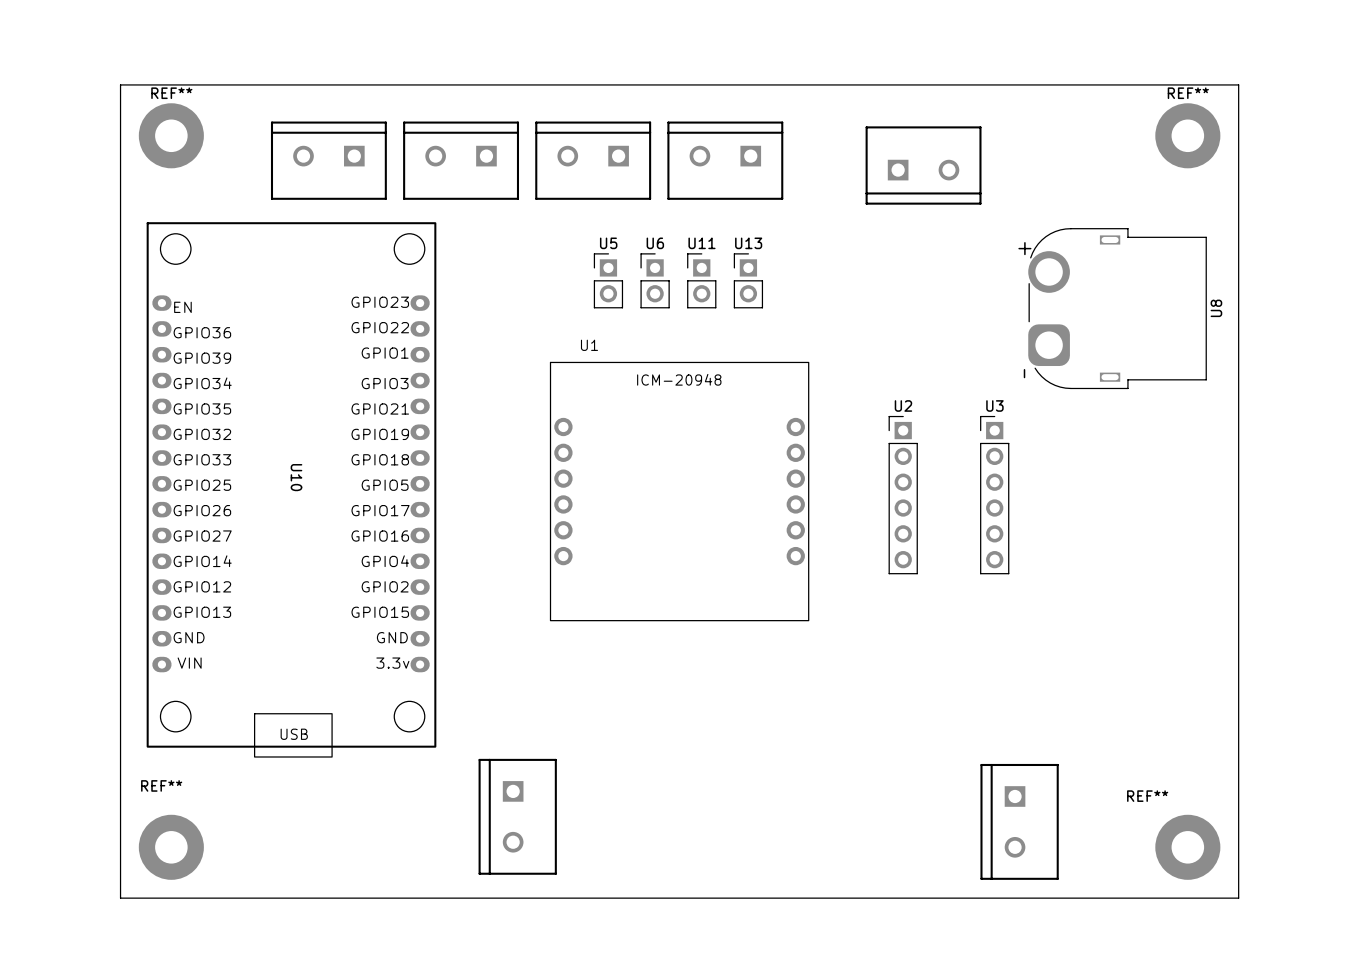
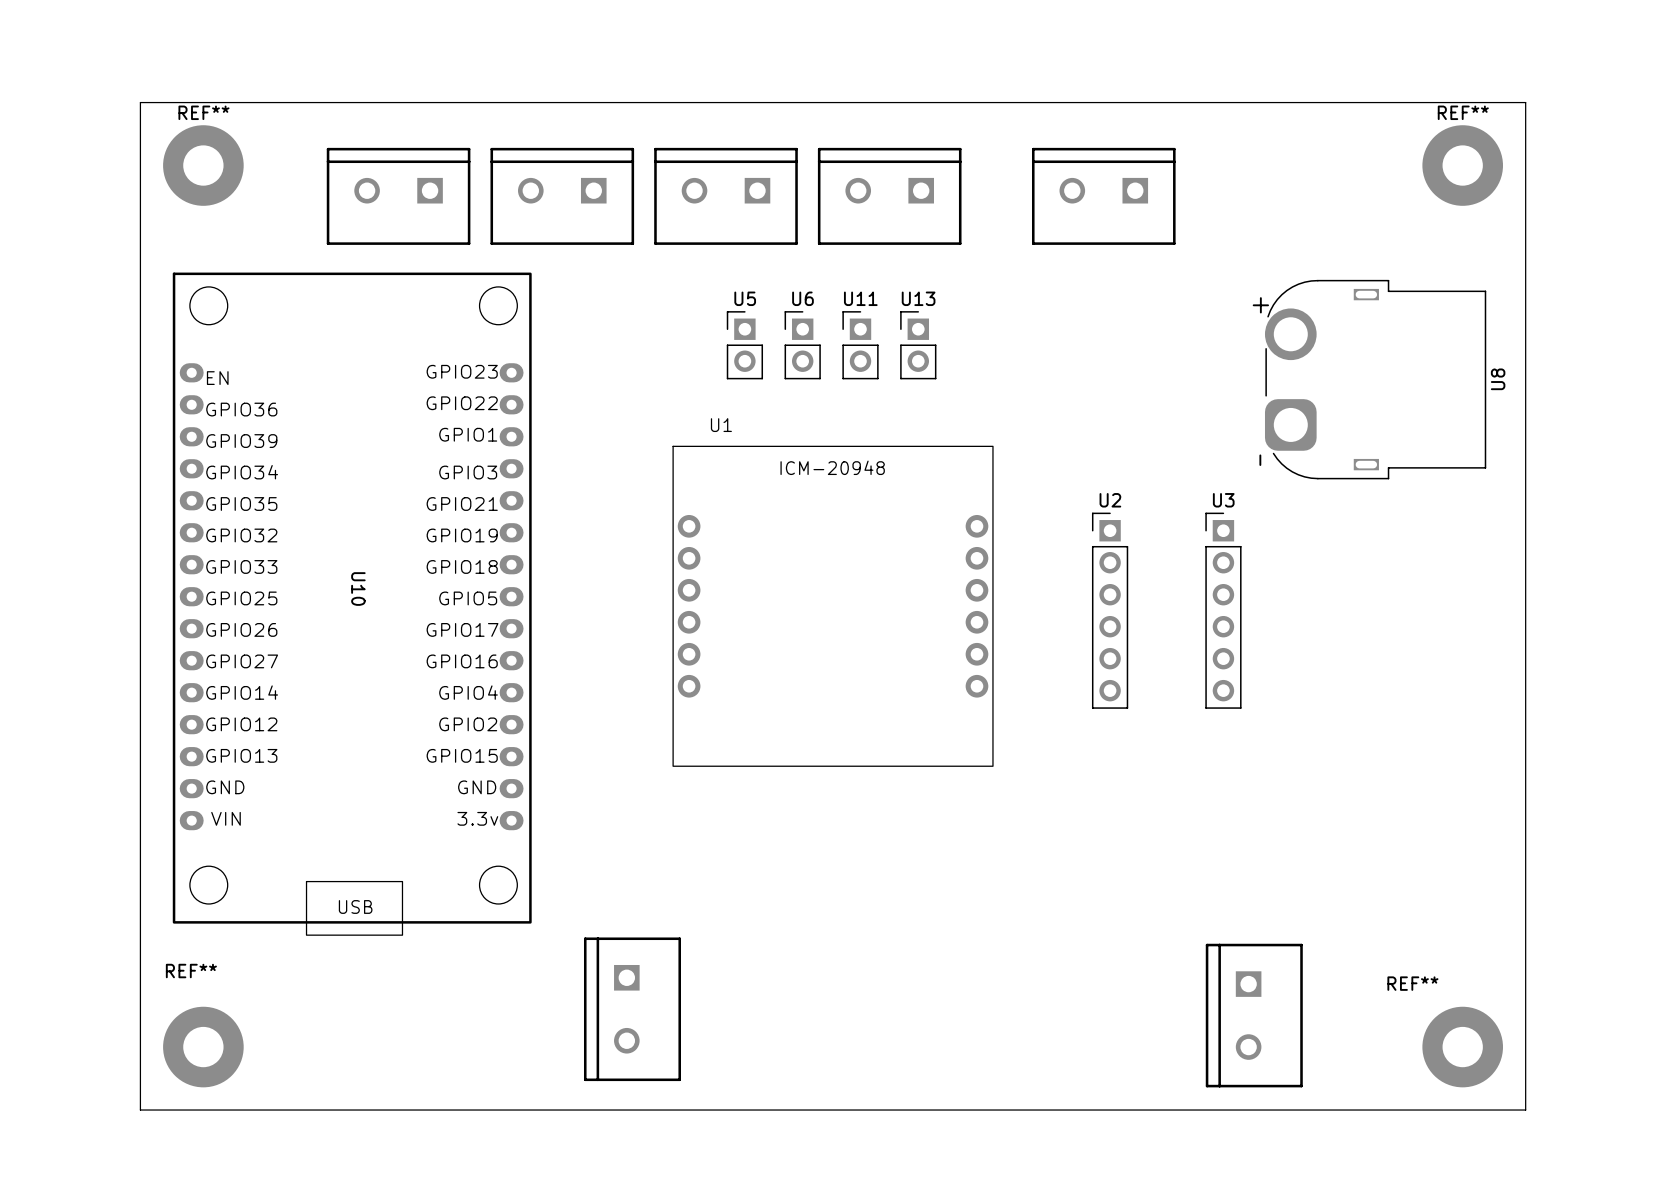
part rotation: 0° (923, 165) -> 180° (1103, 196)

